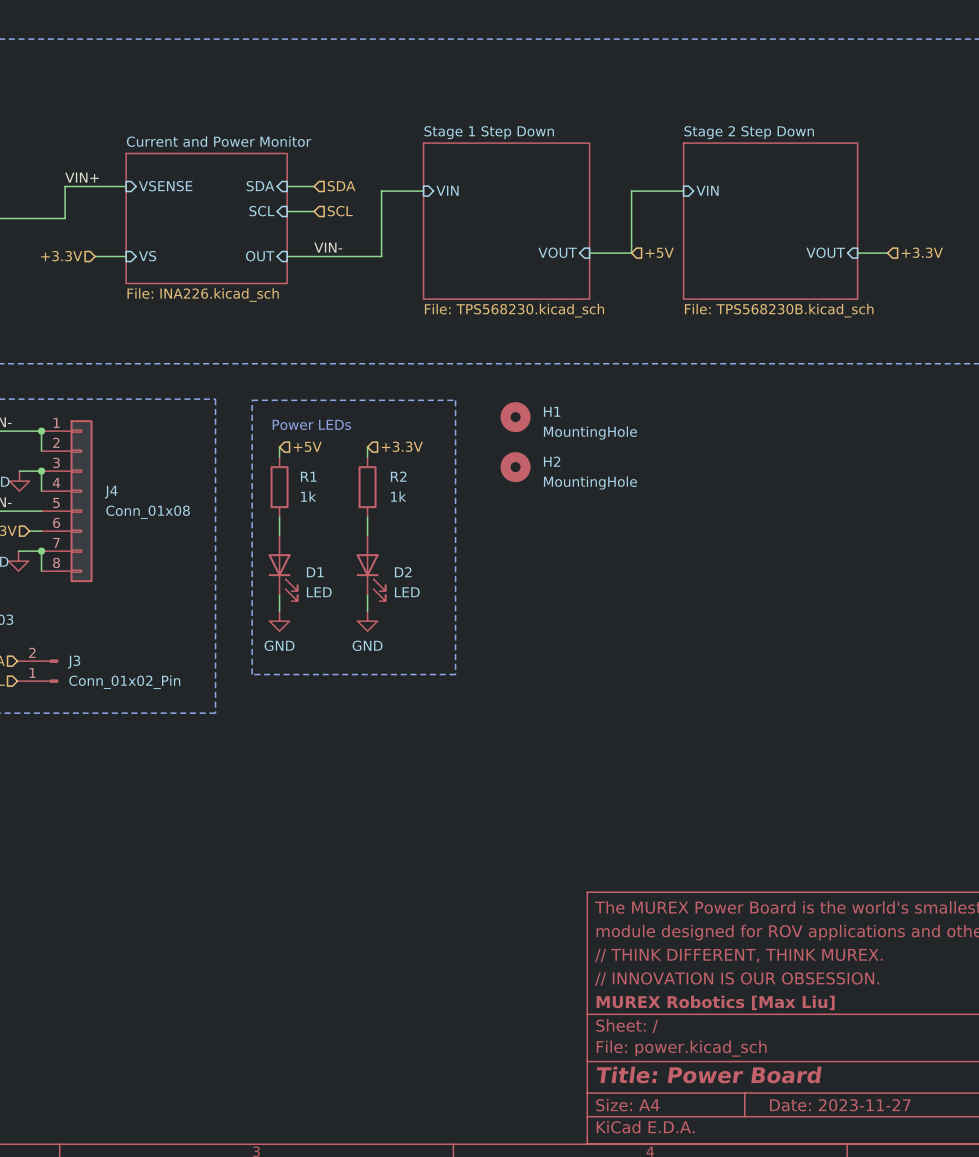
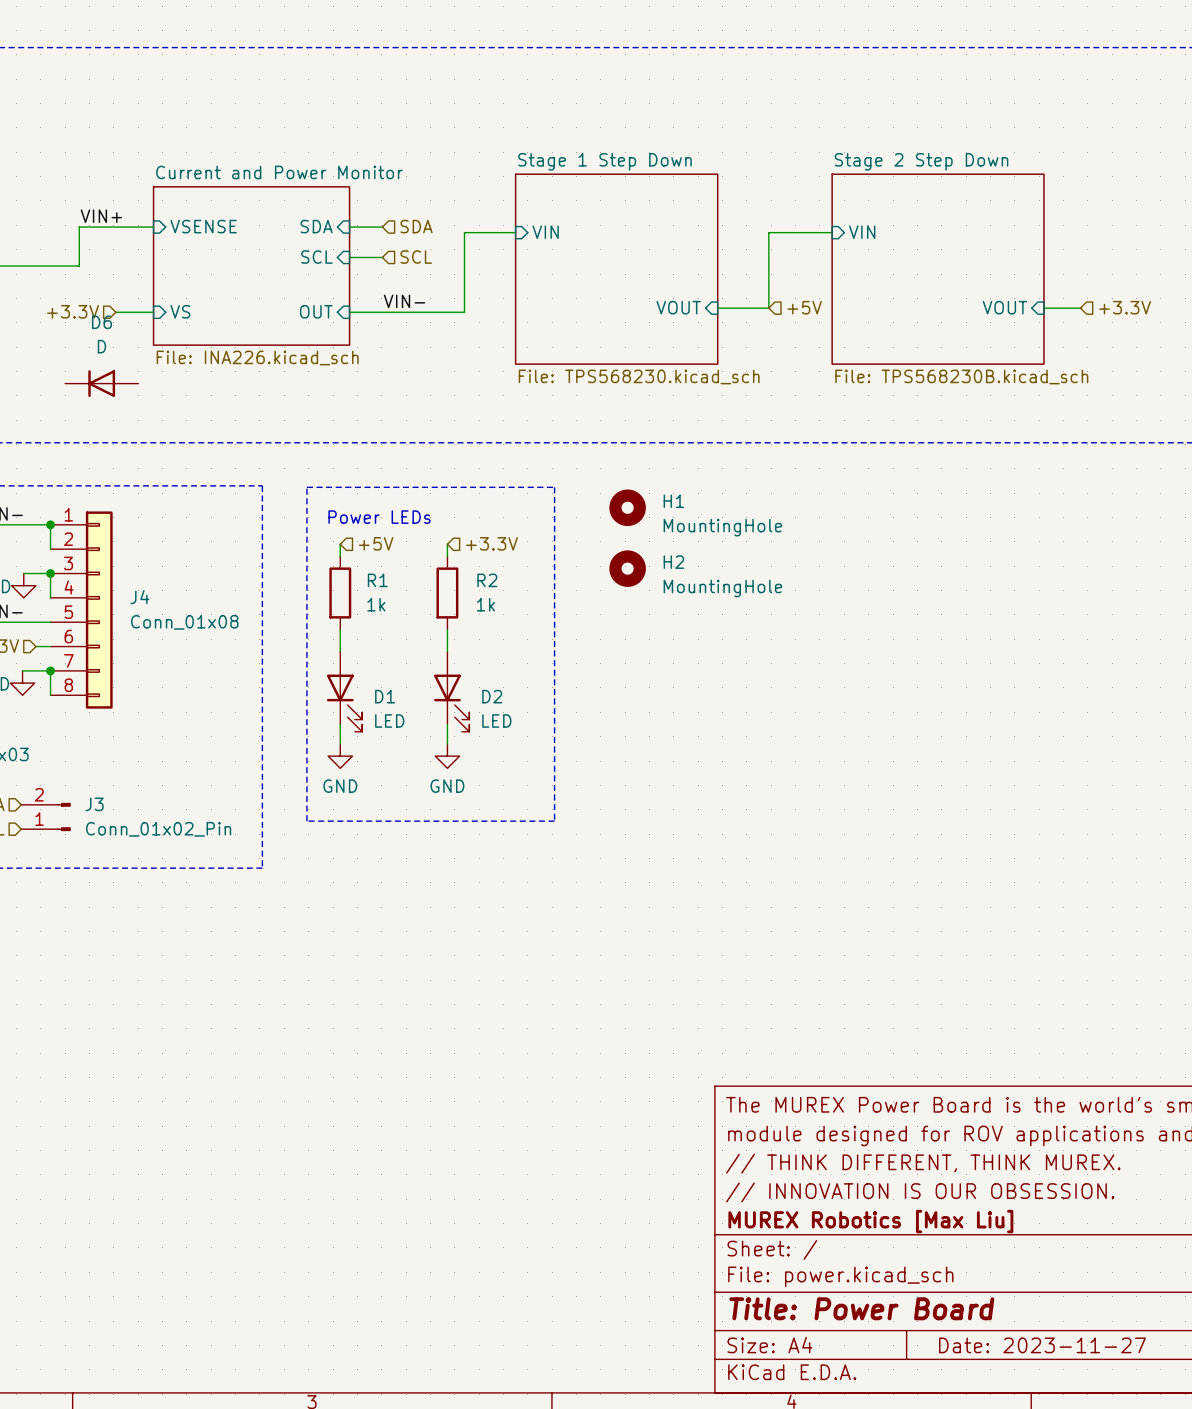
D6: none -> D (101, 383)

